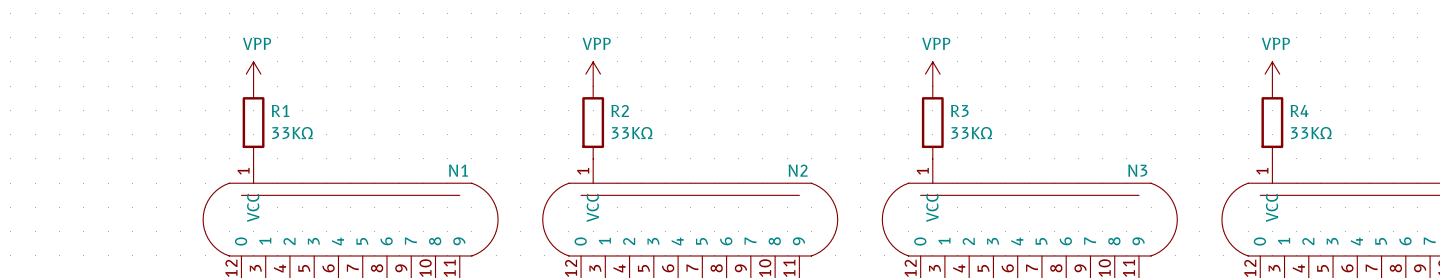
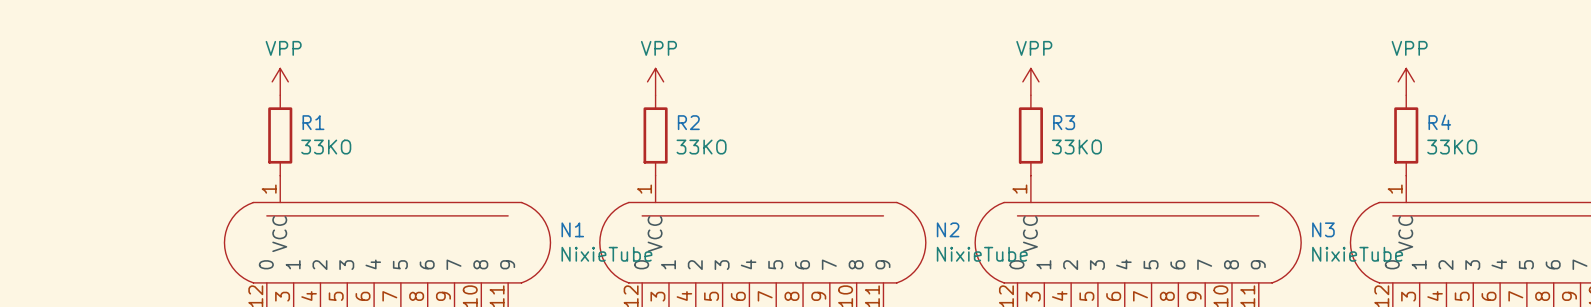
R1 value: 33KΩ (292, 133) -> 33KO (326, 147)
R2 value: 33KΩ (632, 133) -> 33KO (701, 147)
R3 value: 33KΩ (971, 133) -> 33KO (1076, 147)
R4 value: 33KΩ (1311, 133) -> 33KO (1452, 147)
N1 name position: N1 (458, 170) -> N1 (572, 229)
N2 name position: N2 (798, 170) -> N2 (948, 229)
N3 name position: N3 (1137, 170) -> N3 (1323, 229)
N1 value: none -> NixieTube (606, 254)
N2 value: none -> NixieTube (982, 254)
N3 value: none -> NixieTube (1357, 254)

